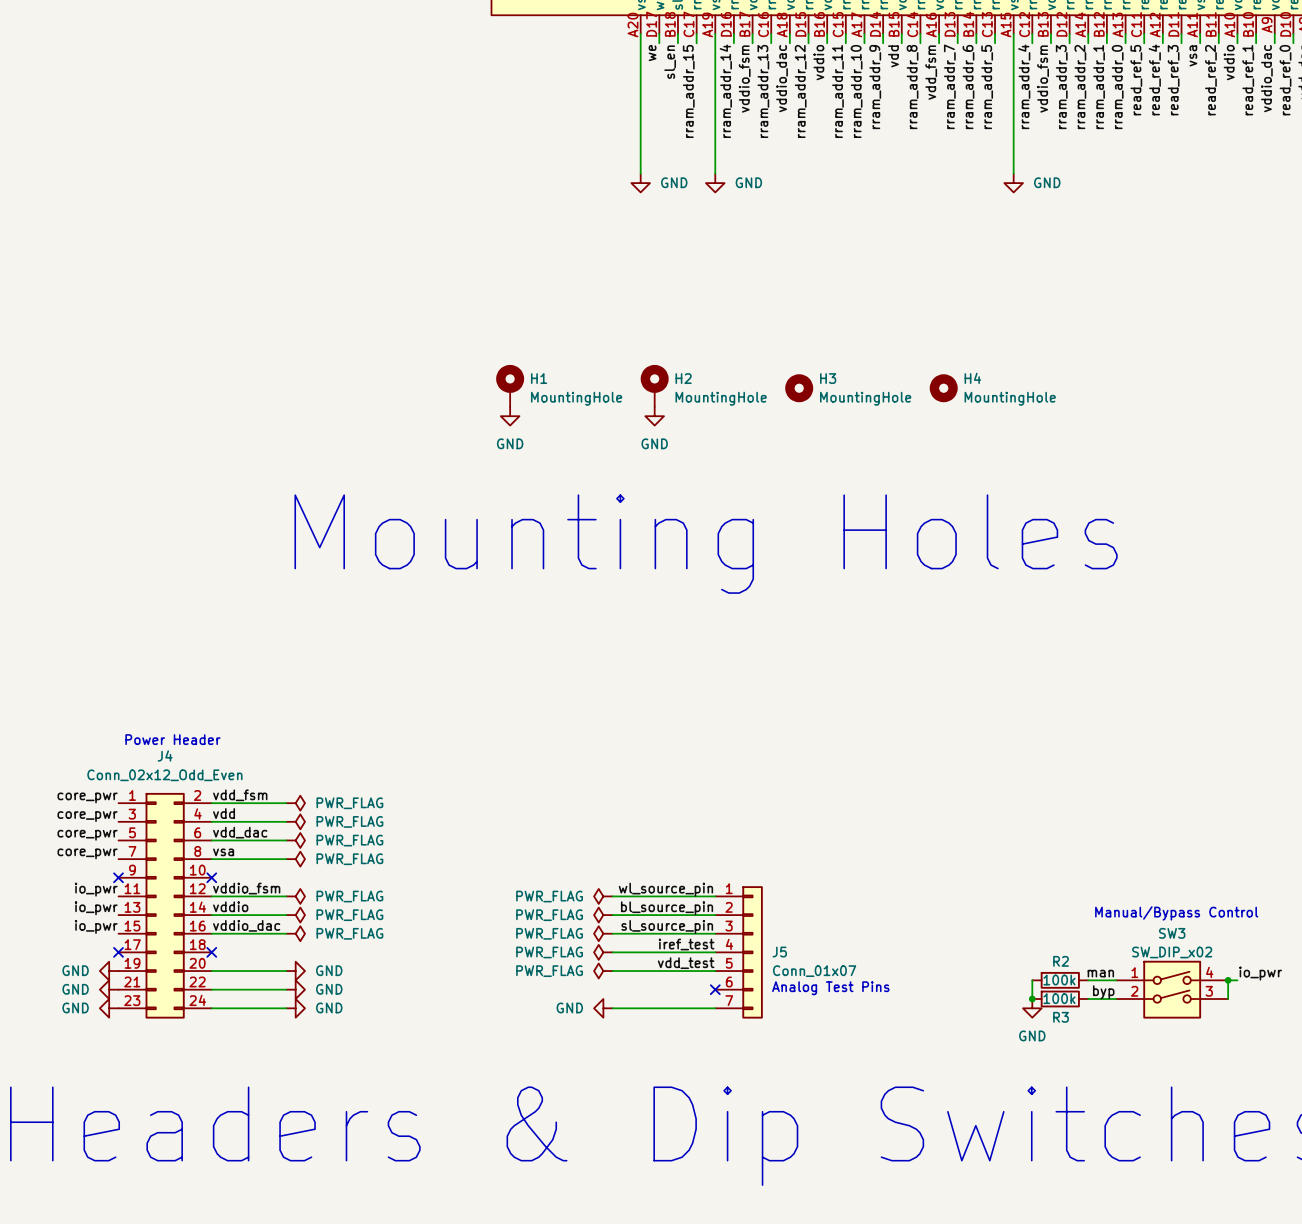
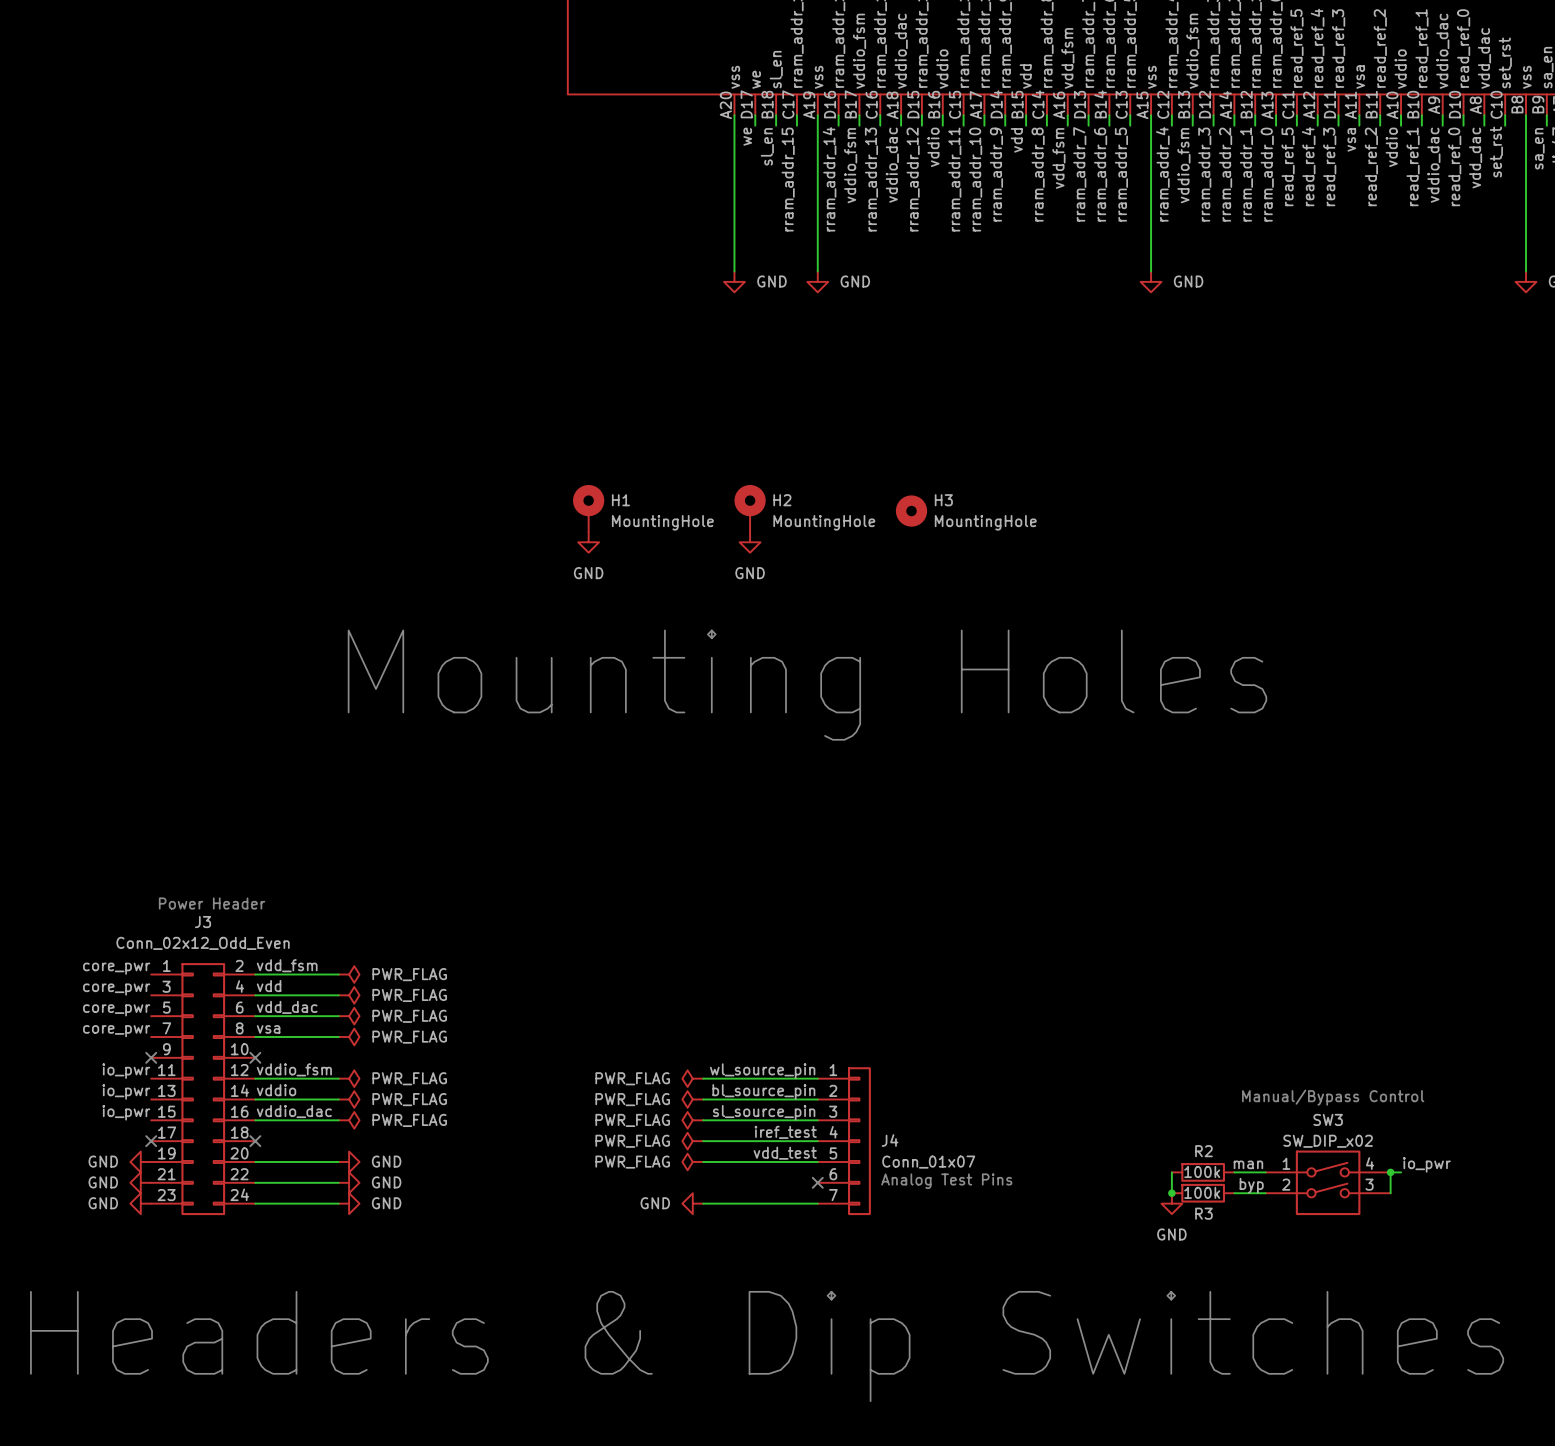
H4: MountingHole (943, 388) -> none
J4 name: J4 (165, 755) -> J3 (203, 922)
J5 name: J5 (779, 952) -> J4 (890, 1140)

